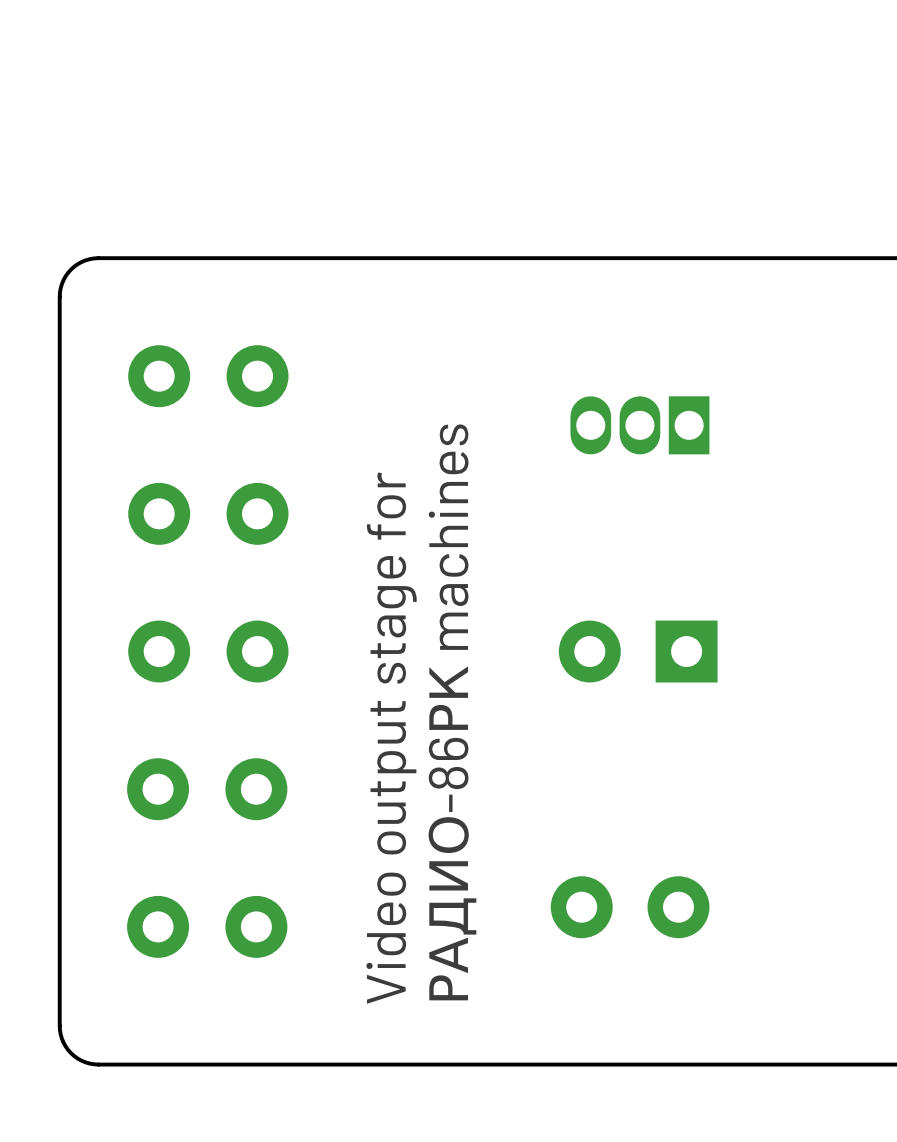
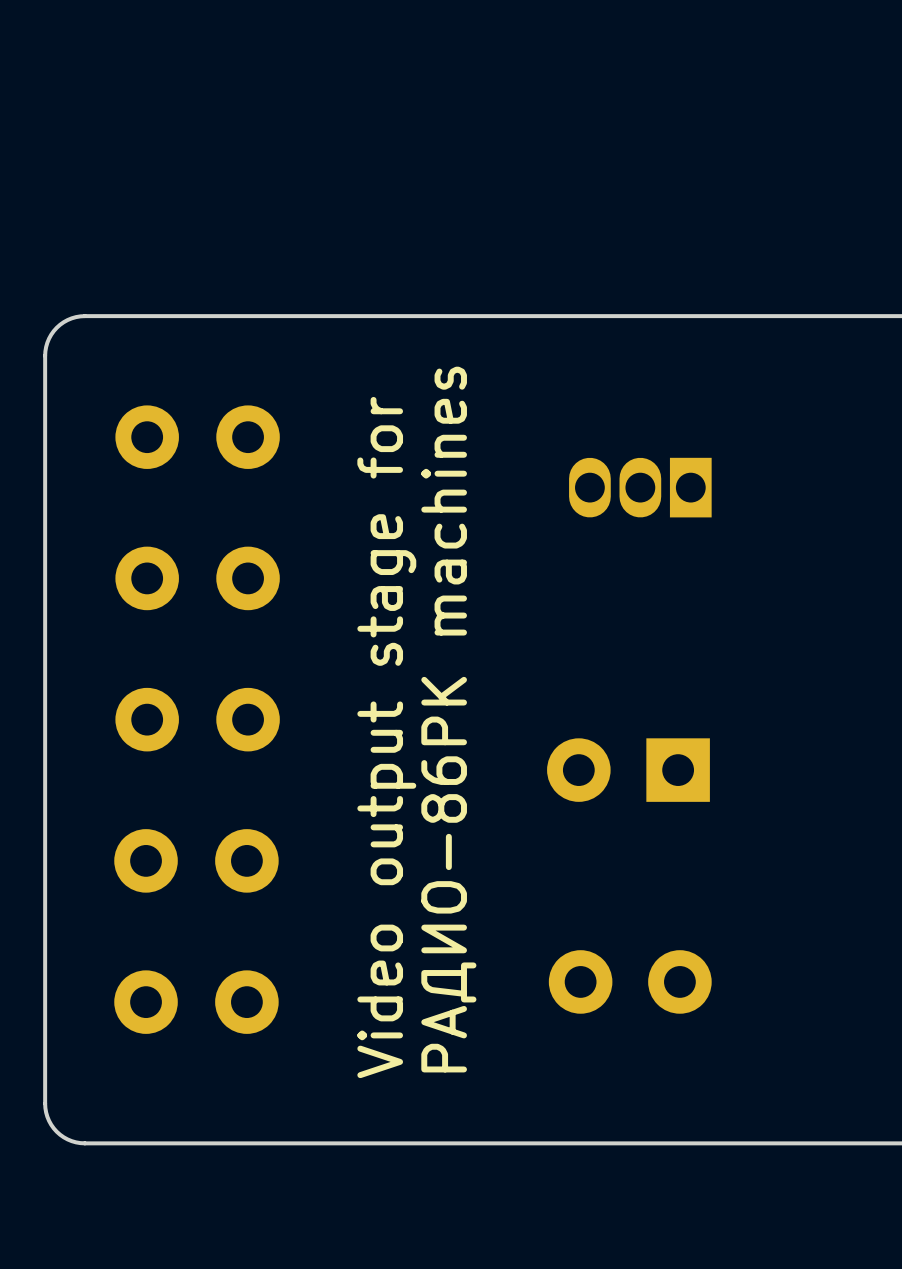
part position: (638, 651) -> (628, 770)

